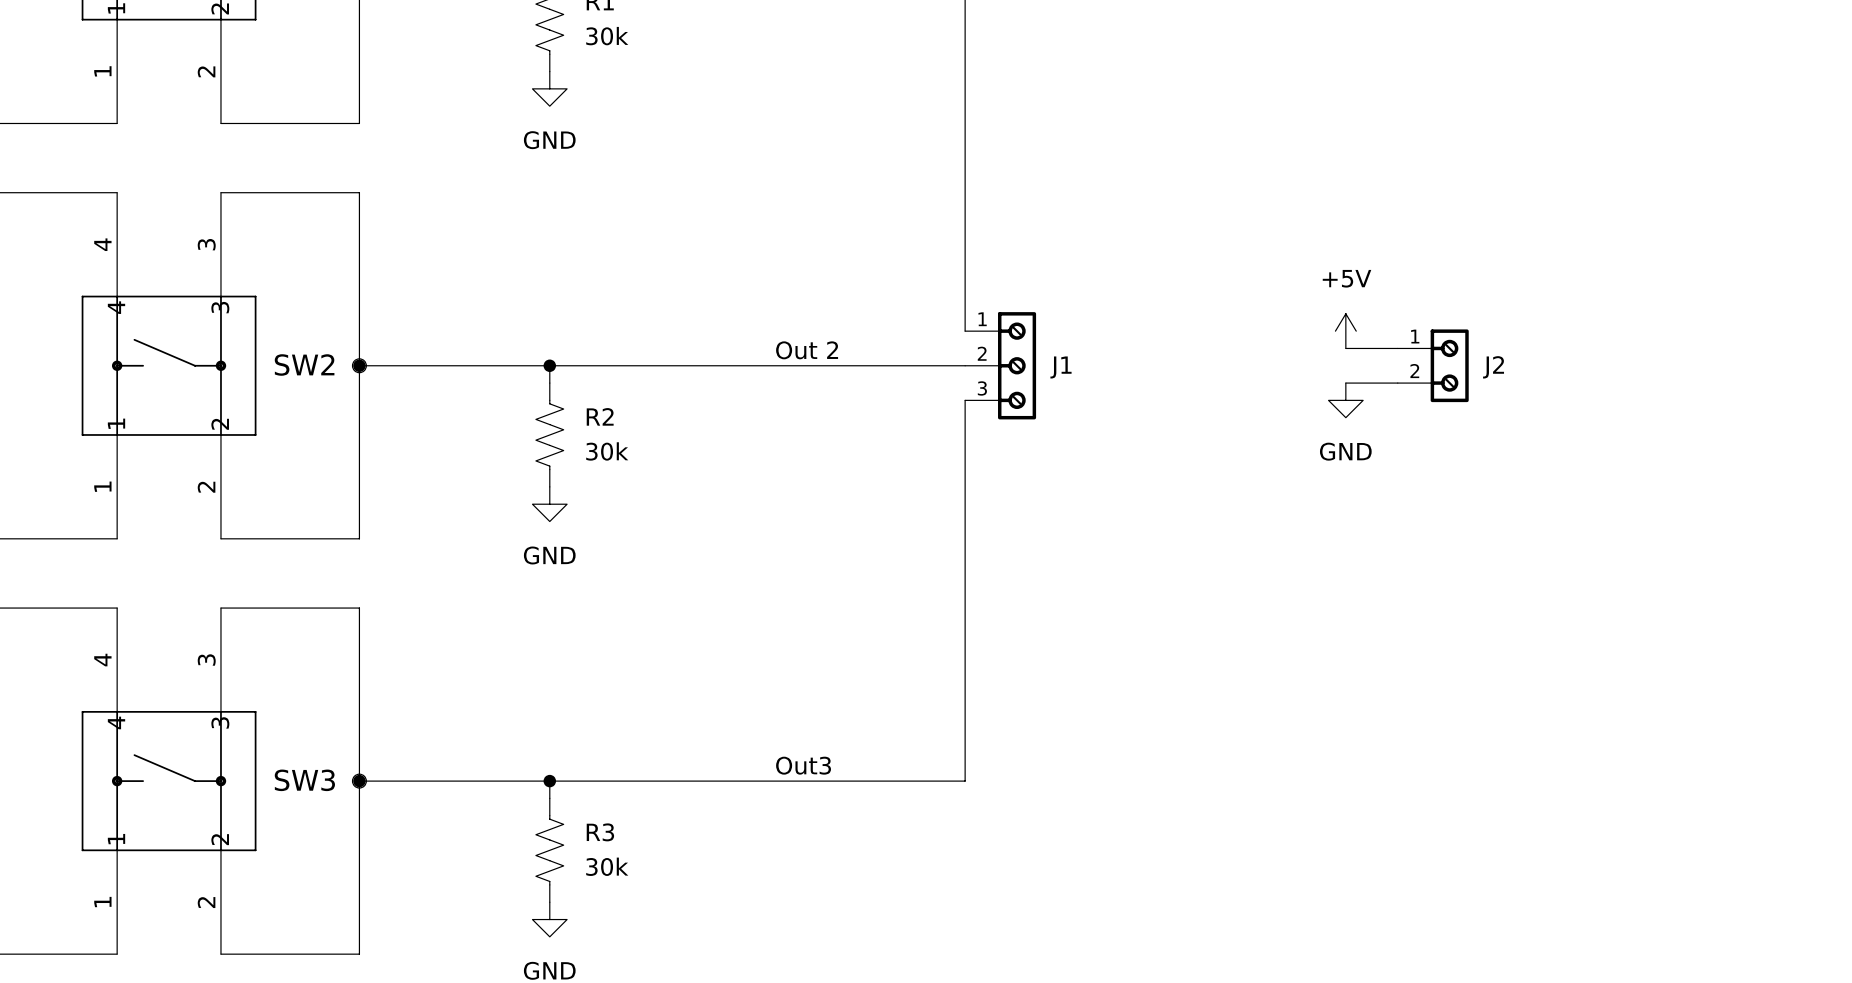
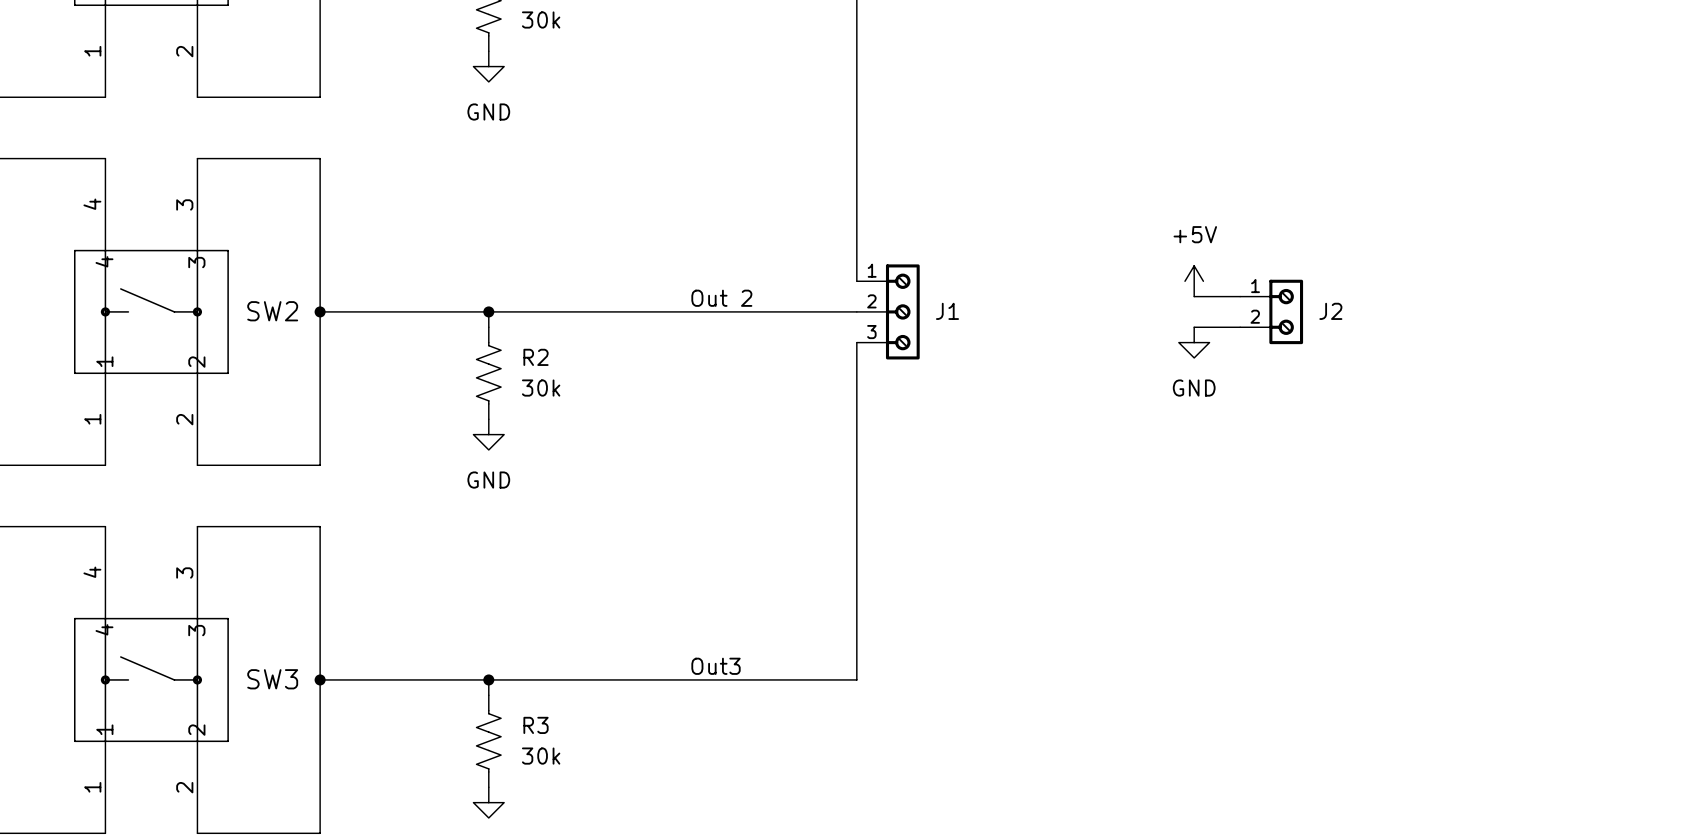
part: (359, 365) -> none
part: (359, 781) -> none

